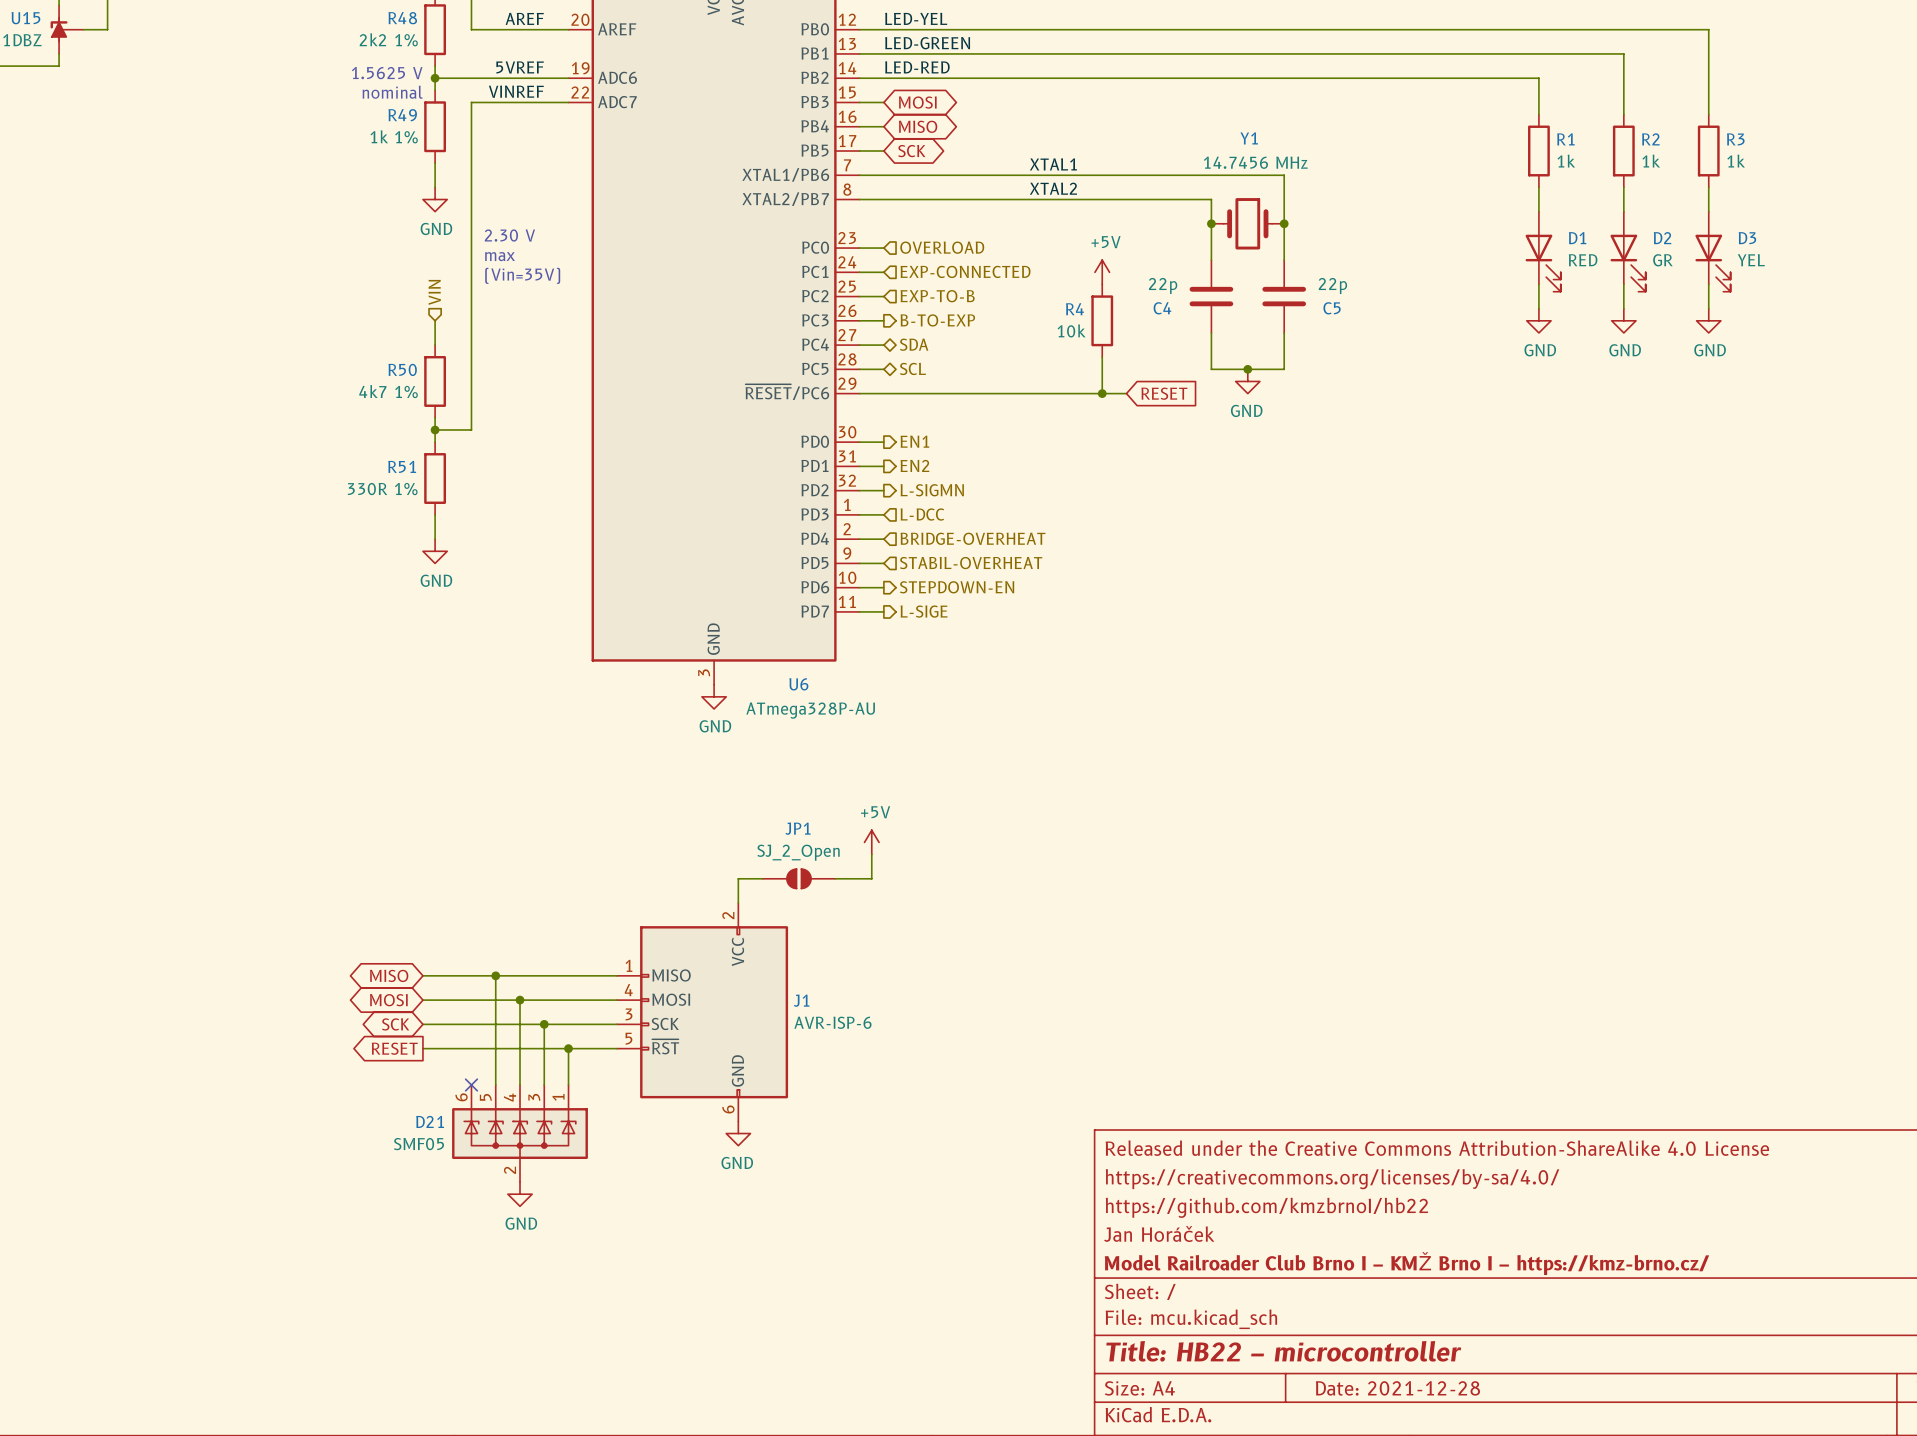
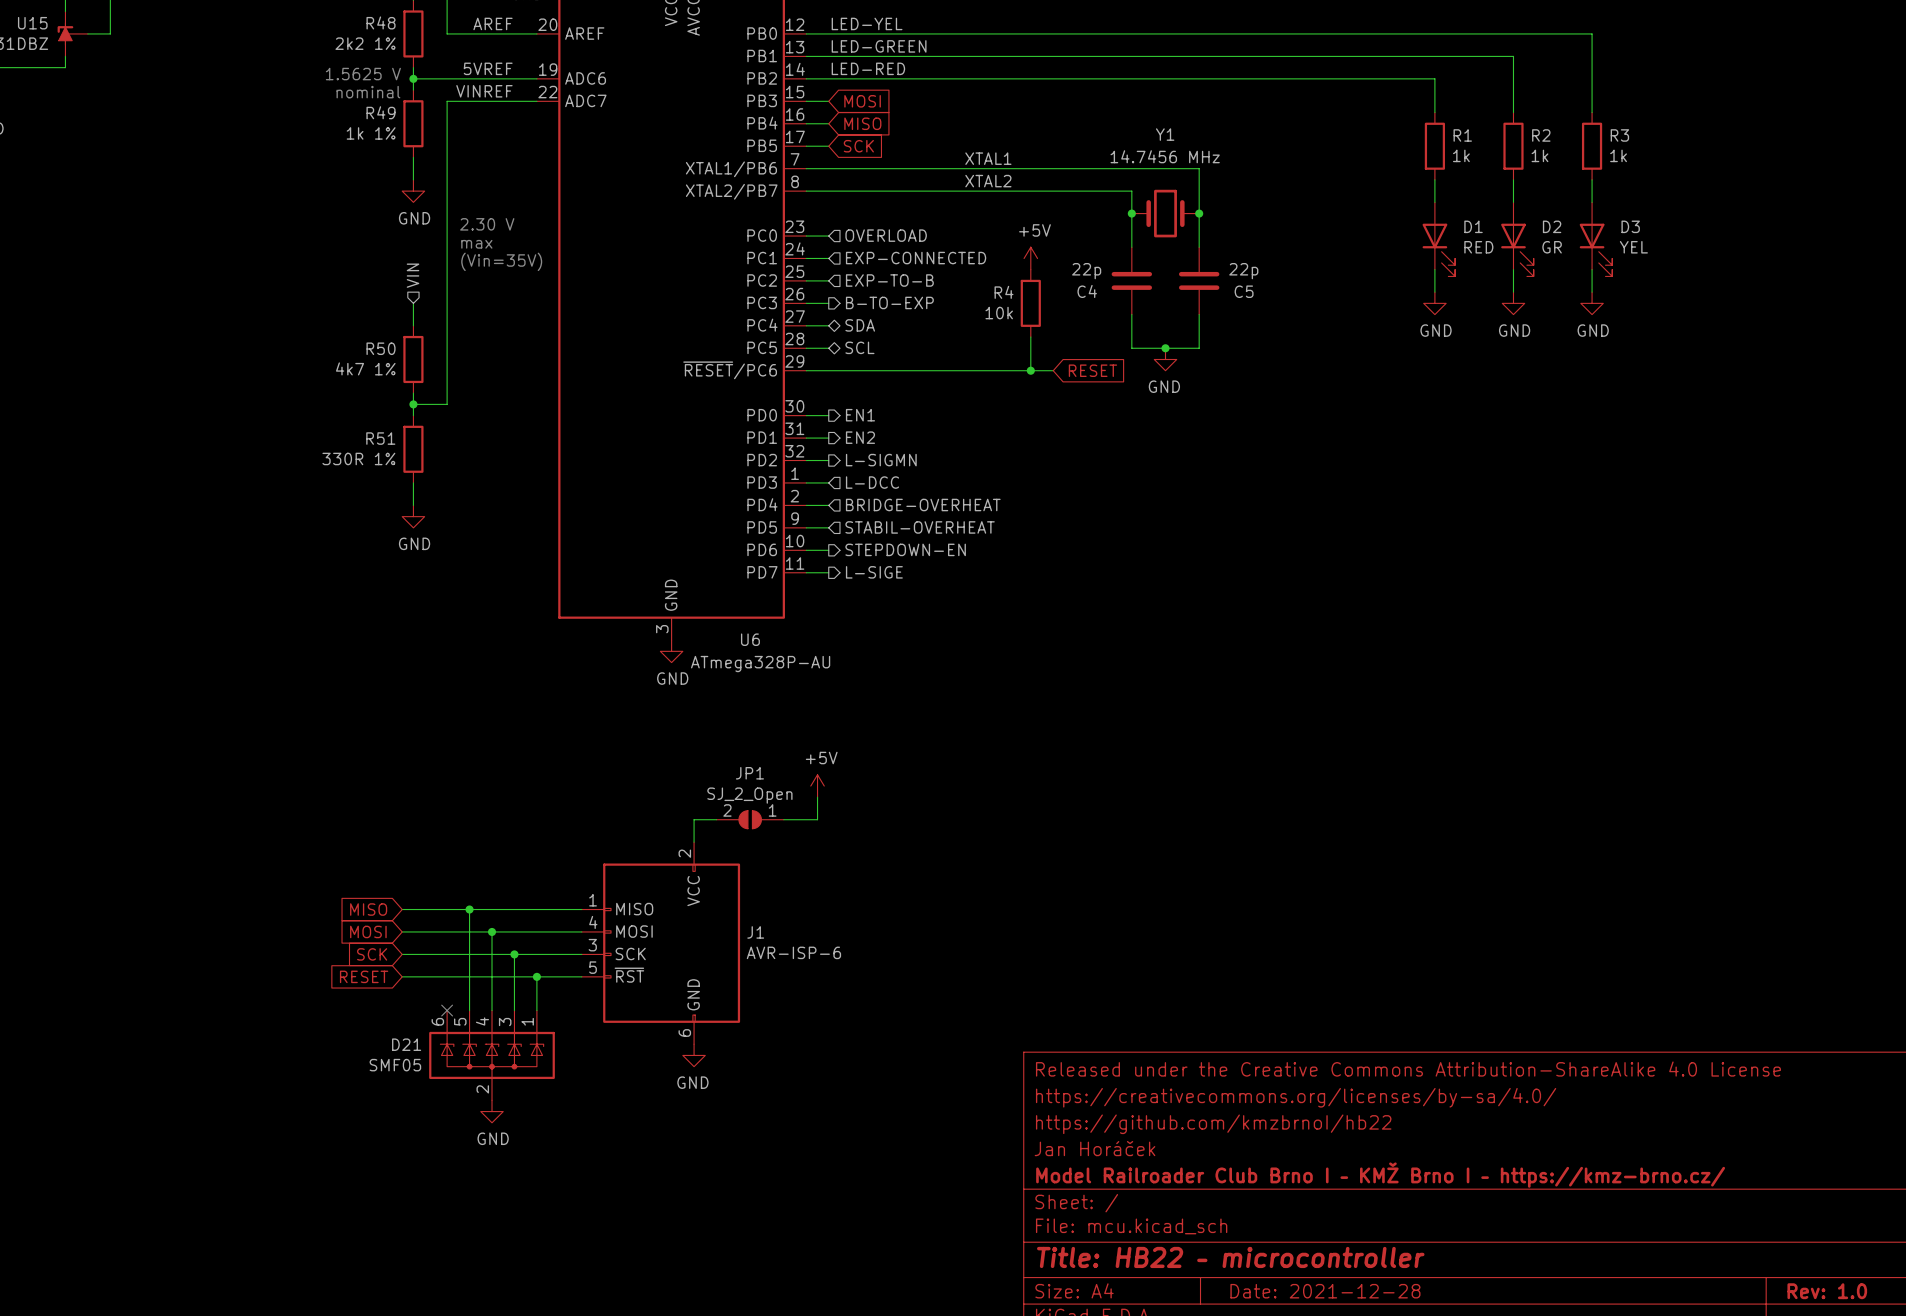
global label shape: bidirectional (917, 102) -> input (862, 101)
global label shape: bidirectional (918, 126) -> input (862, 123)
global label shape: bidirectional (911, 151) -> input (858, 146)
JP1 pin number: none -> 2 (727, 810)
JP1 pin number: none -> 1 (772, 810)
global label shape: bidirectional (389, 975) -> input (368, 909)
global label shape: bidirectional (388, 1000) -> input (368, 931)
global label shape: bidirectional (395, 1024) -> input (372, 954)
global label shape: output (394, 1048) -> input (364, 976)

